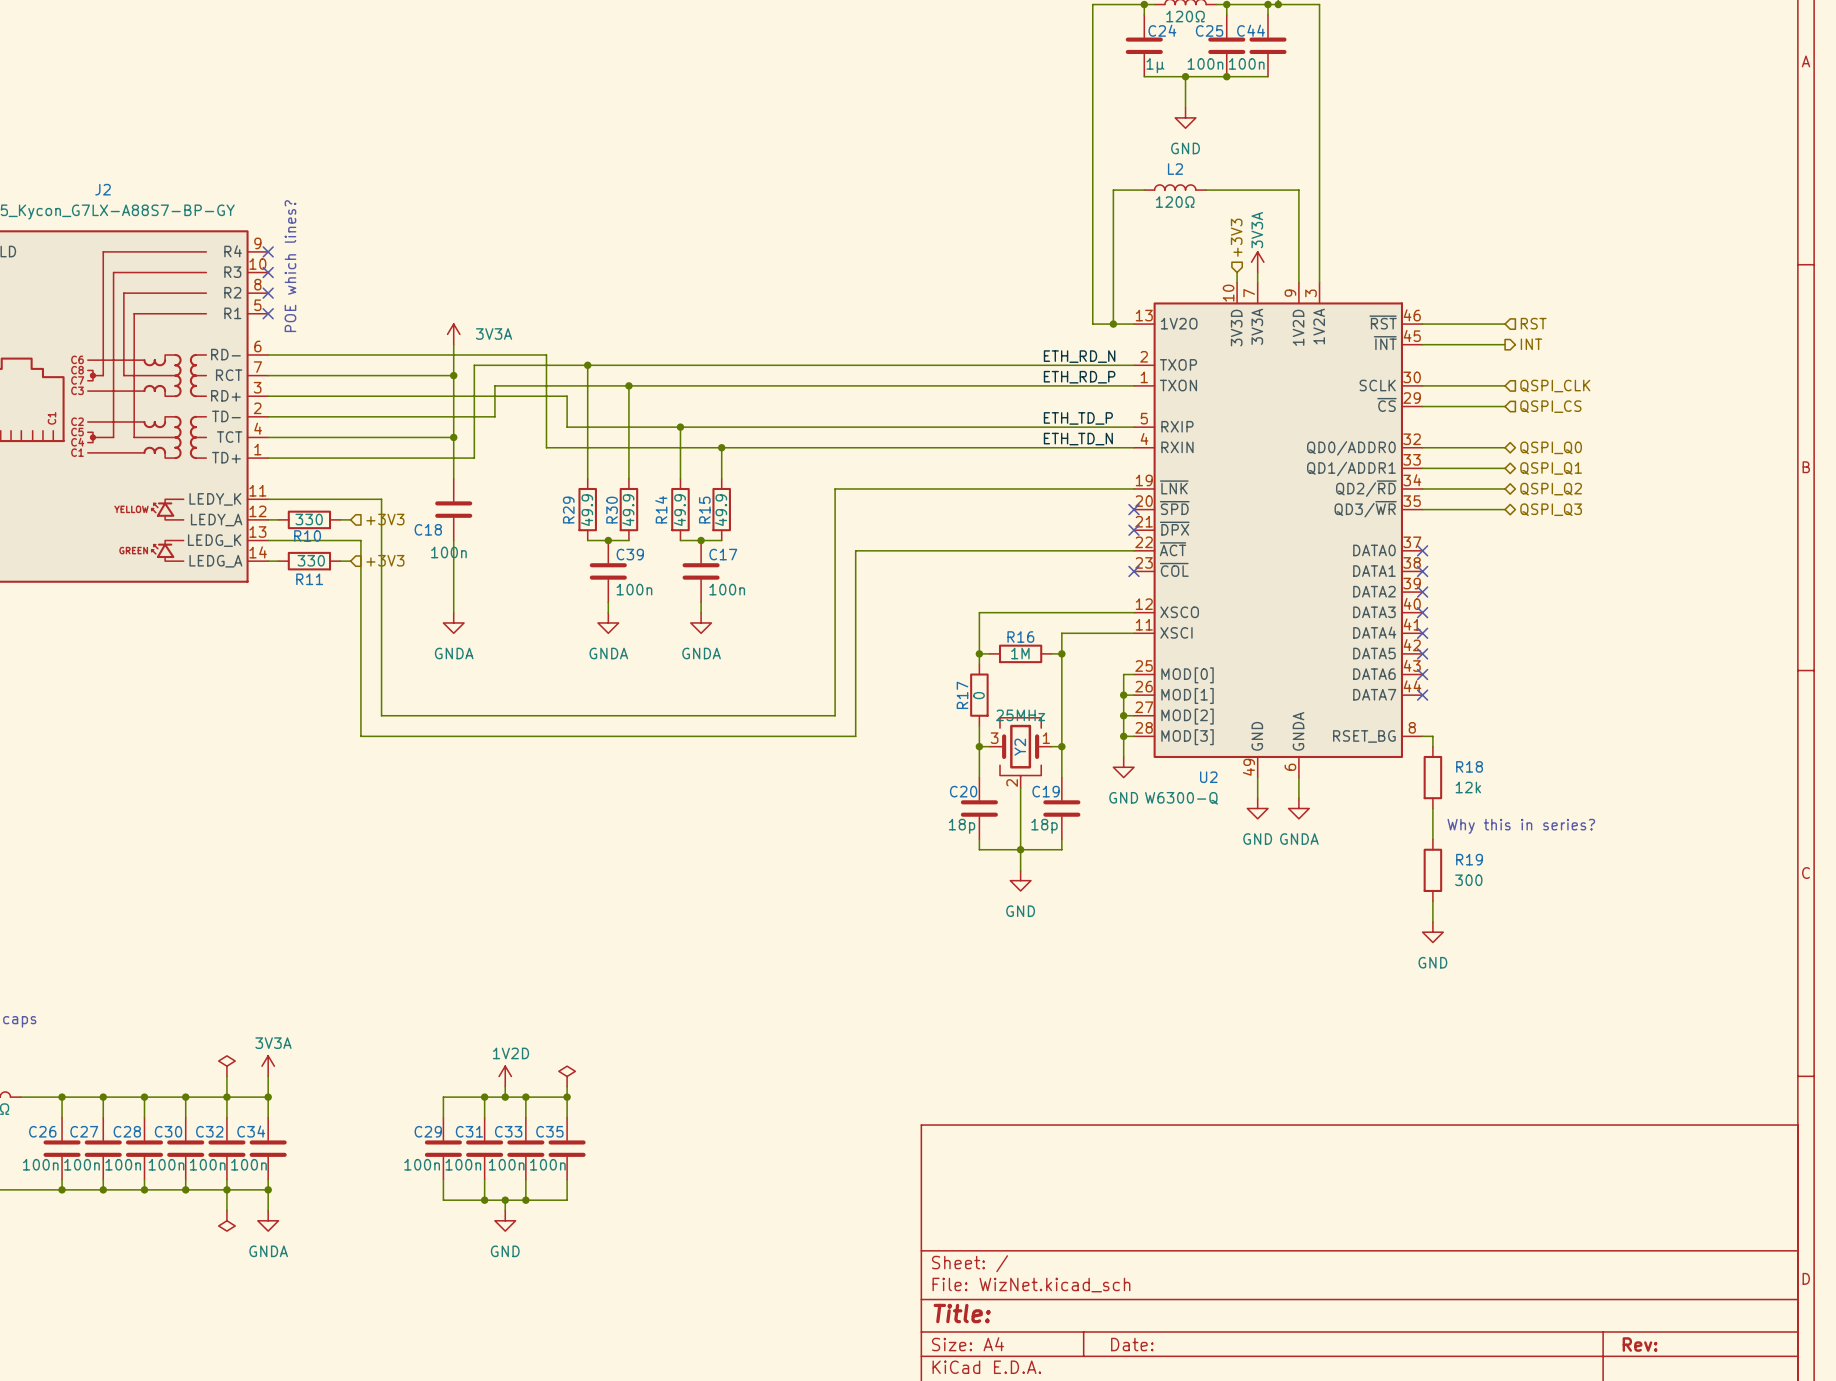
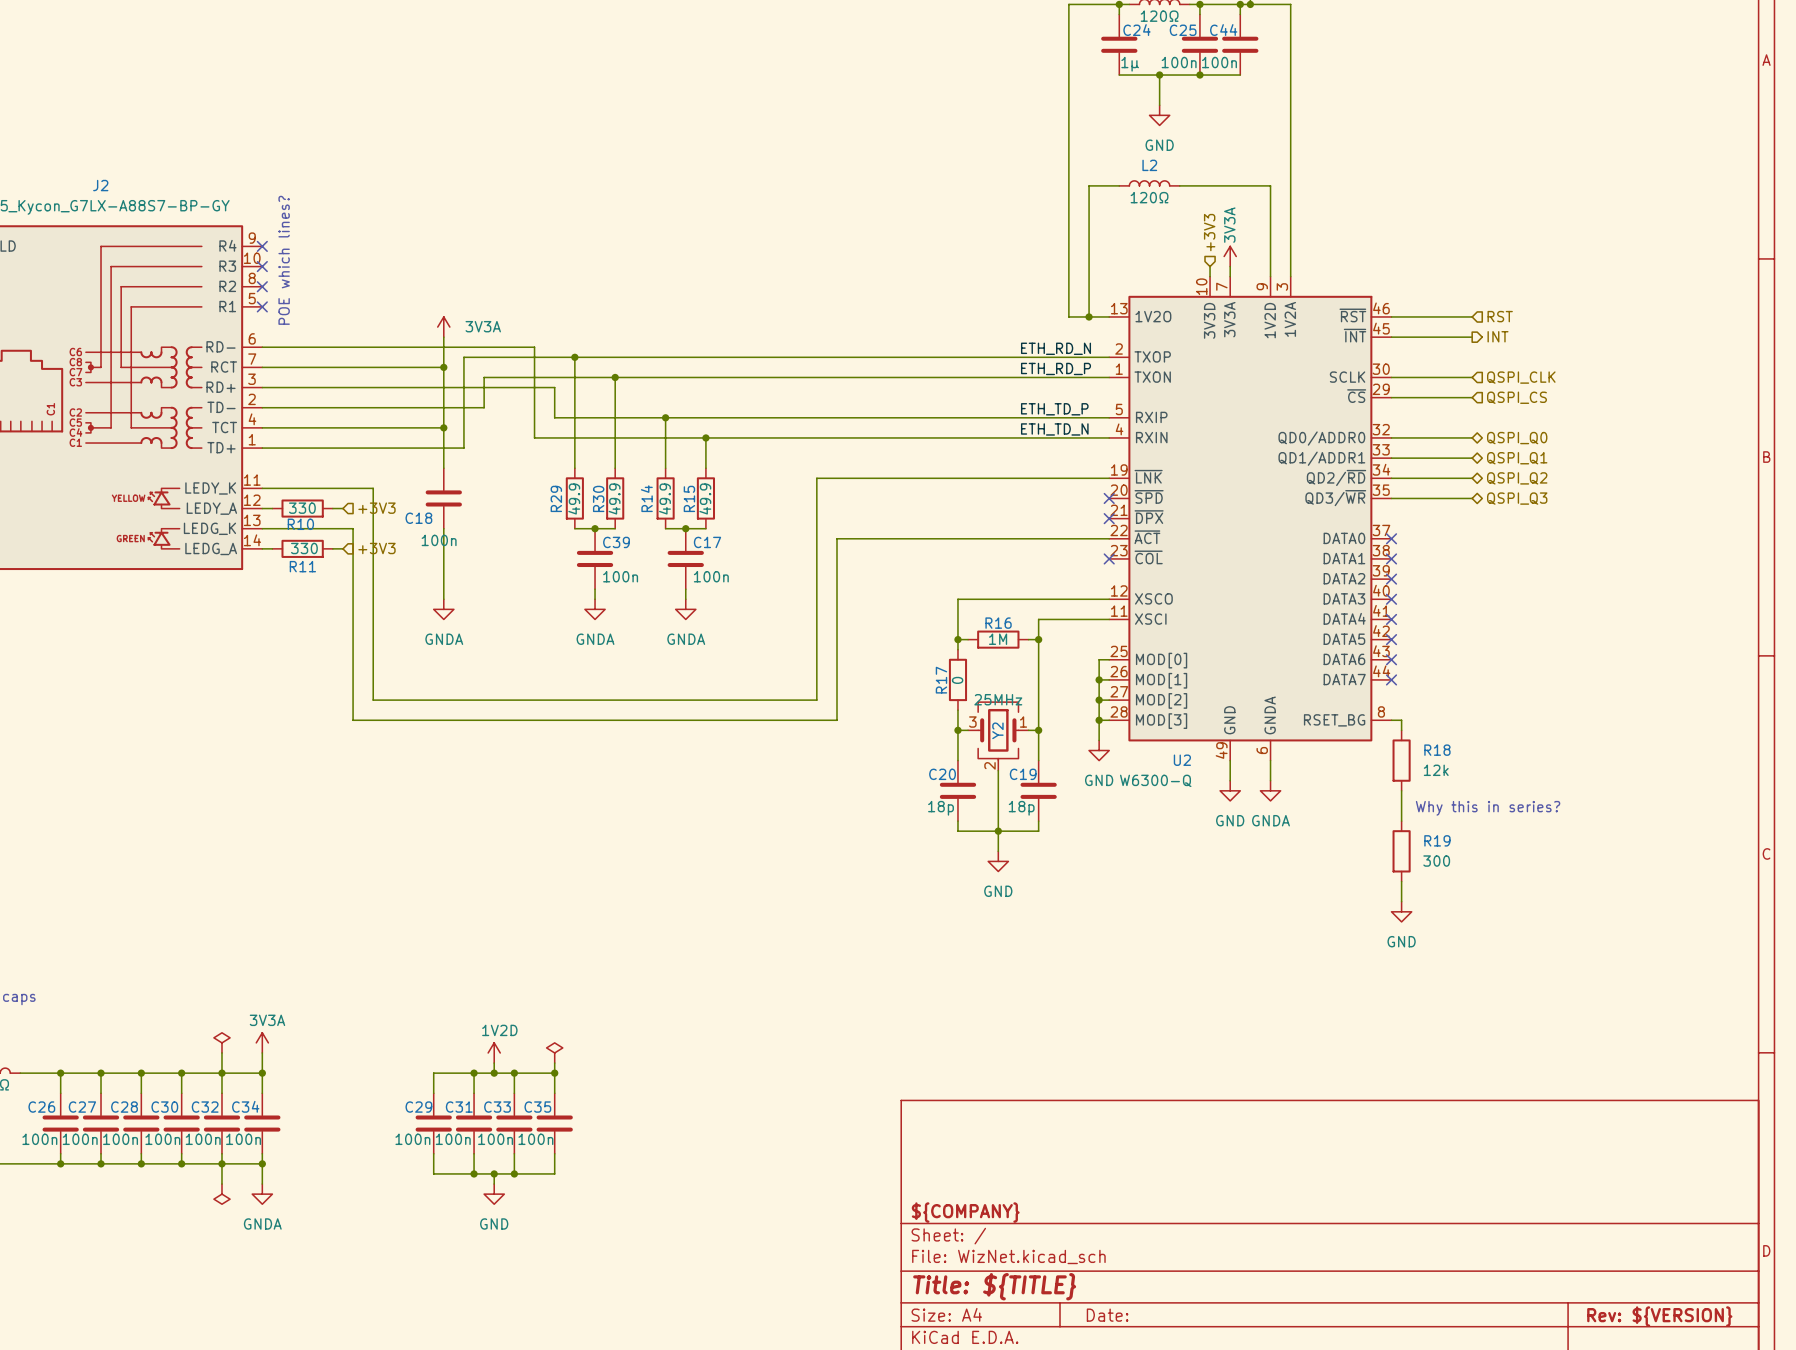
title block: none -> ${COMPANY} (965, 1212)
title block: Title: (962, 1313) -> Title: ${TITLE} (994, 1286)
title block: Rev: (1640, 1344) -> Rev: ${VERSION} (1659, 1316)

